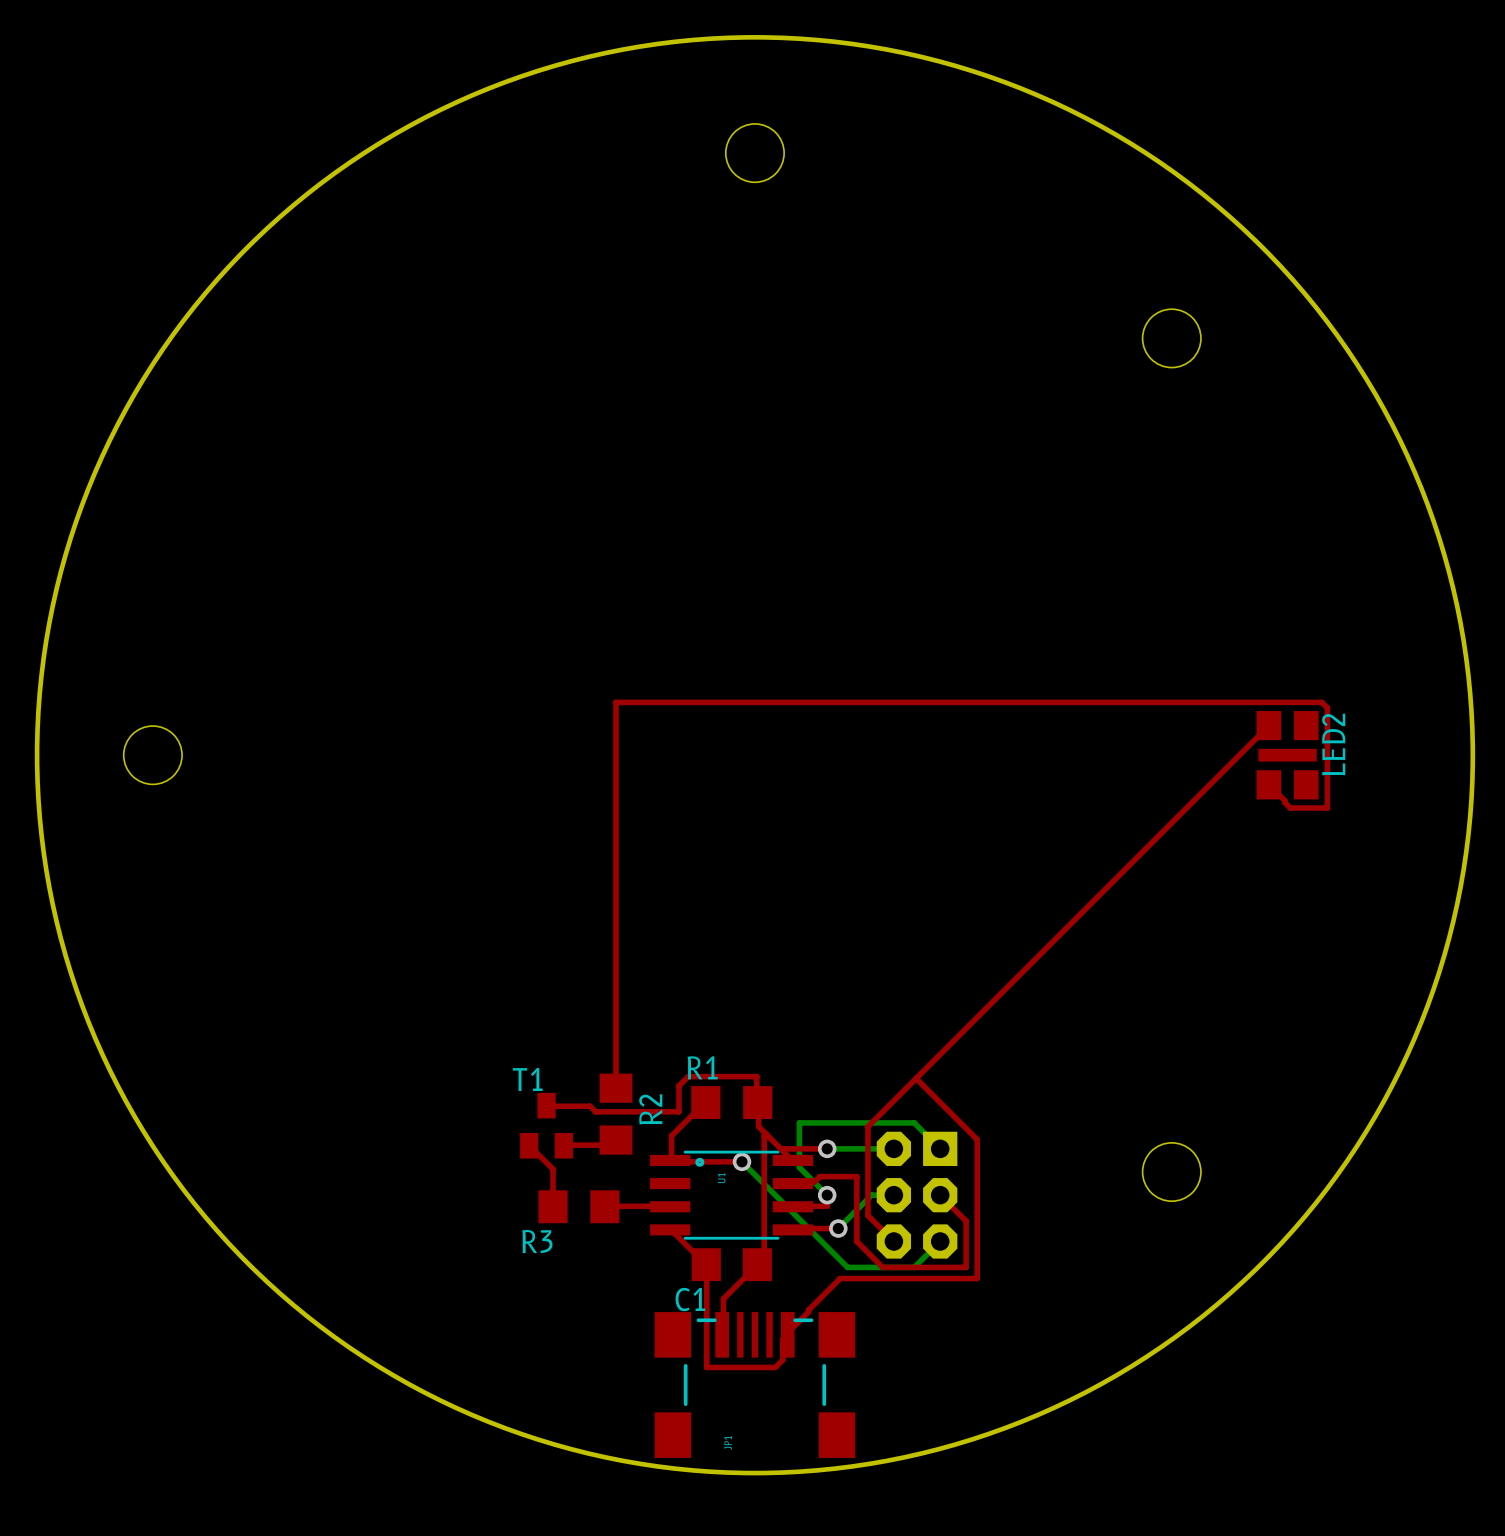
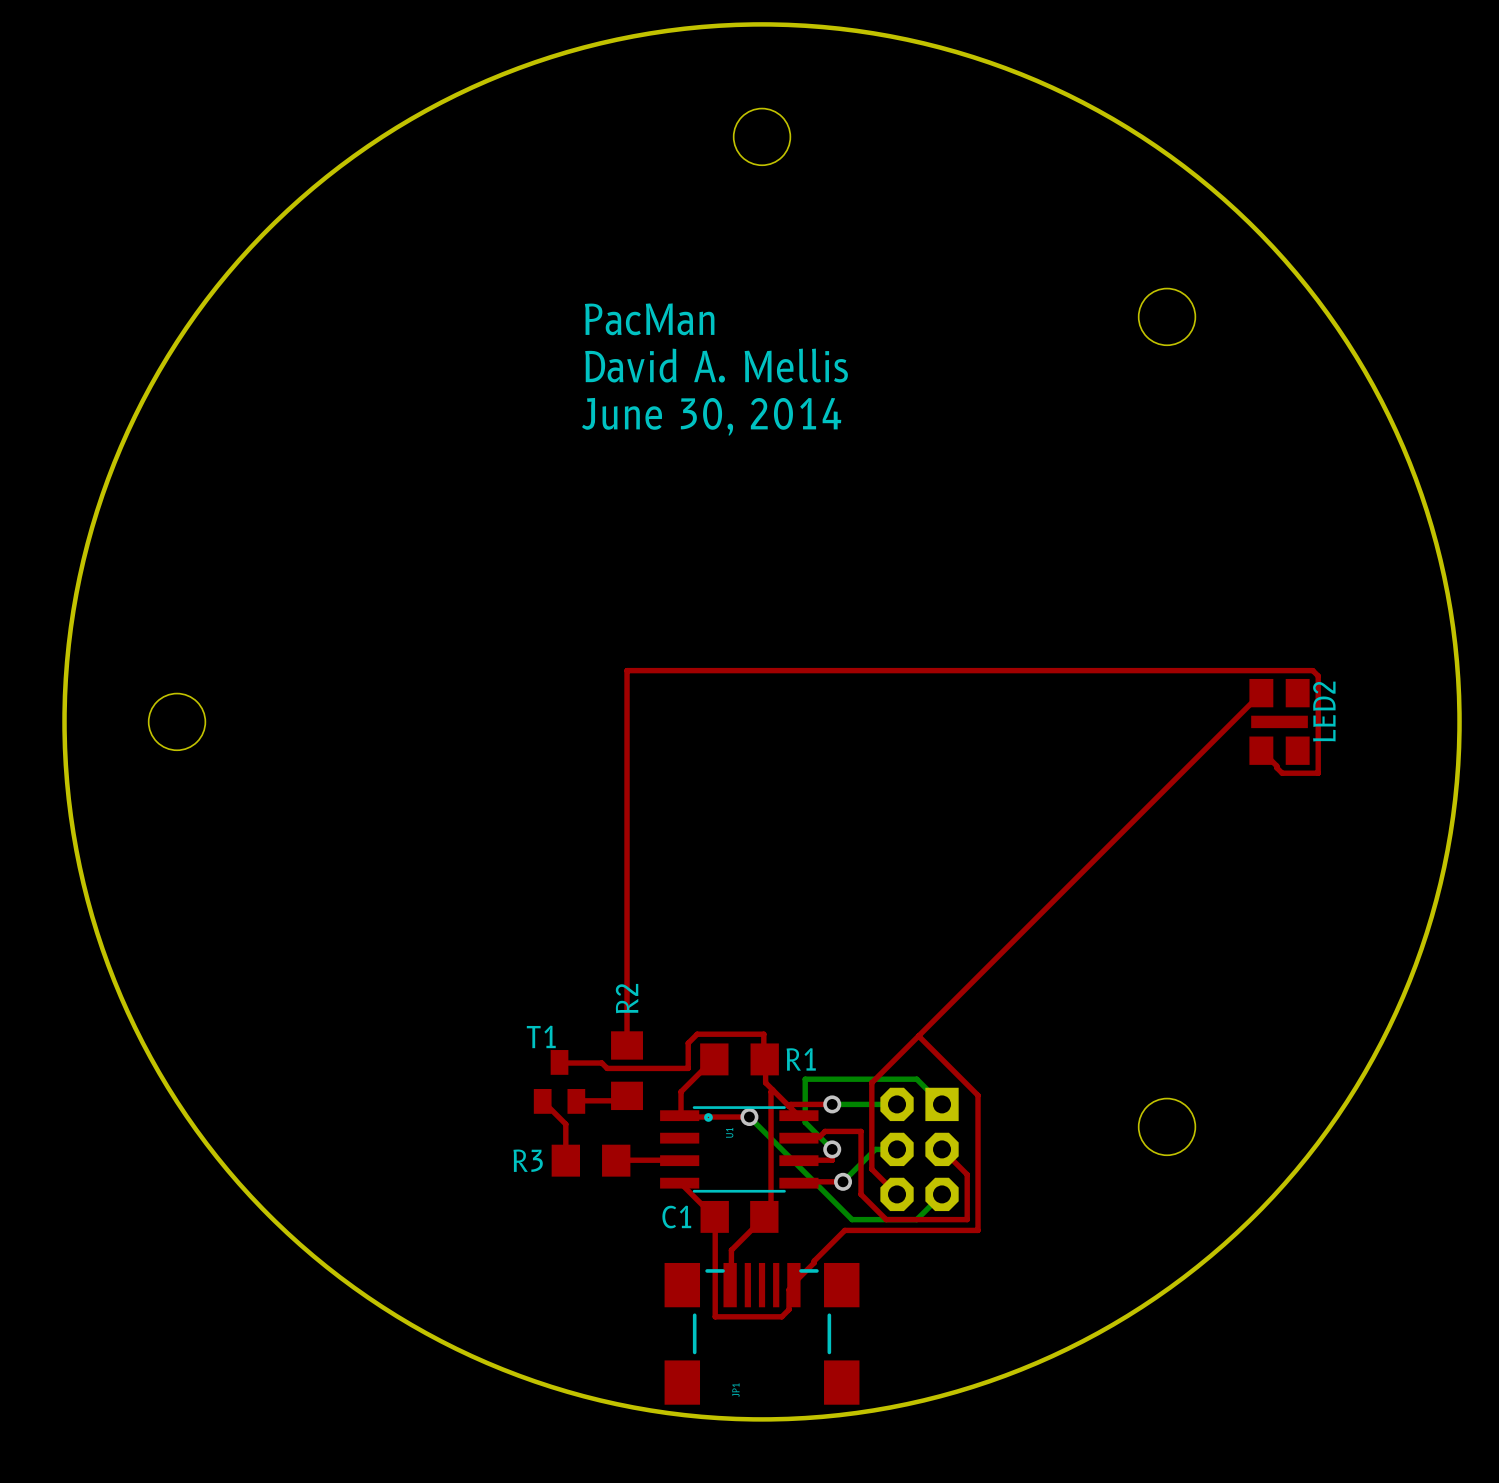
text: none -> PacMan (649, 319)
text: none -> David A. Mellis (716, 365)
text: none -> June 30, 2014 (711, 416)
R1 name position: R1 (702, 1067) -> R1 (801, 1059)
R2 name position: R2 (650, 1109) -> R2 (627, 998)
R3 name position: R3 (537, 1241) -> R3 (528, 1160)
C1 name position: C1 (690, 1299) -> C1 (676, 1217)

